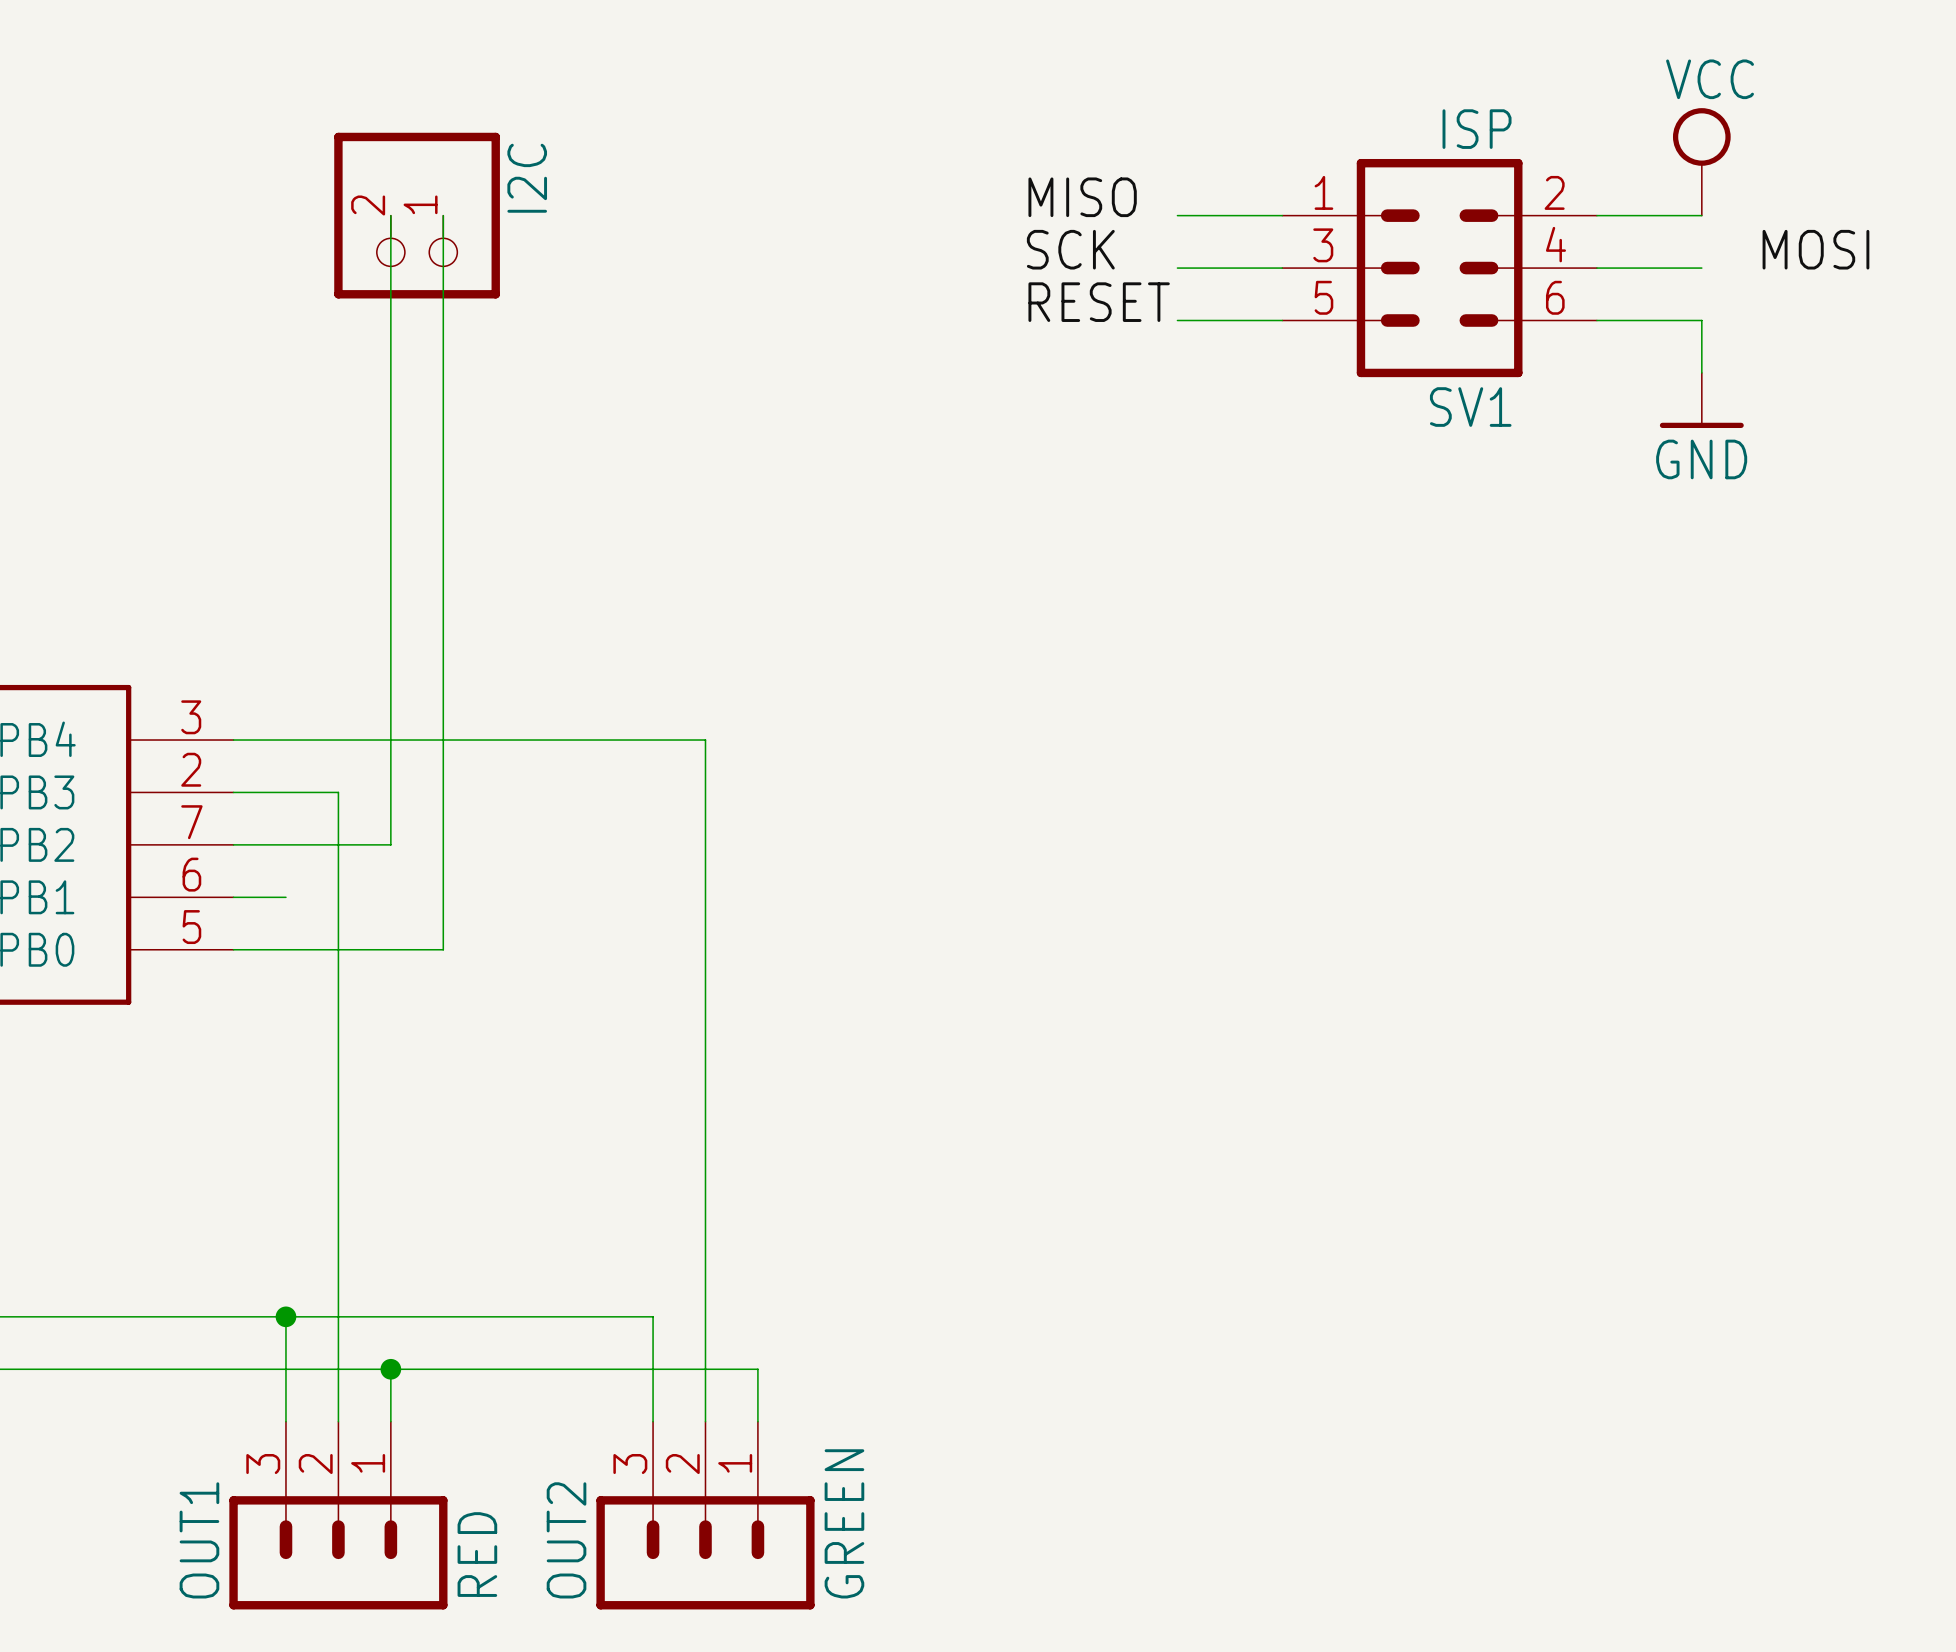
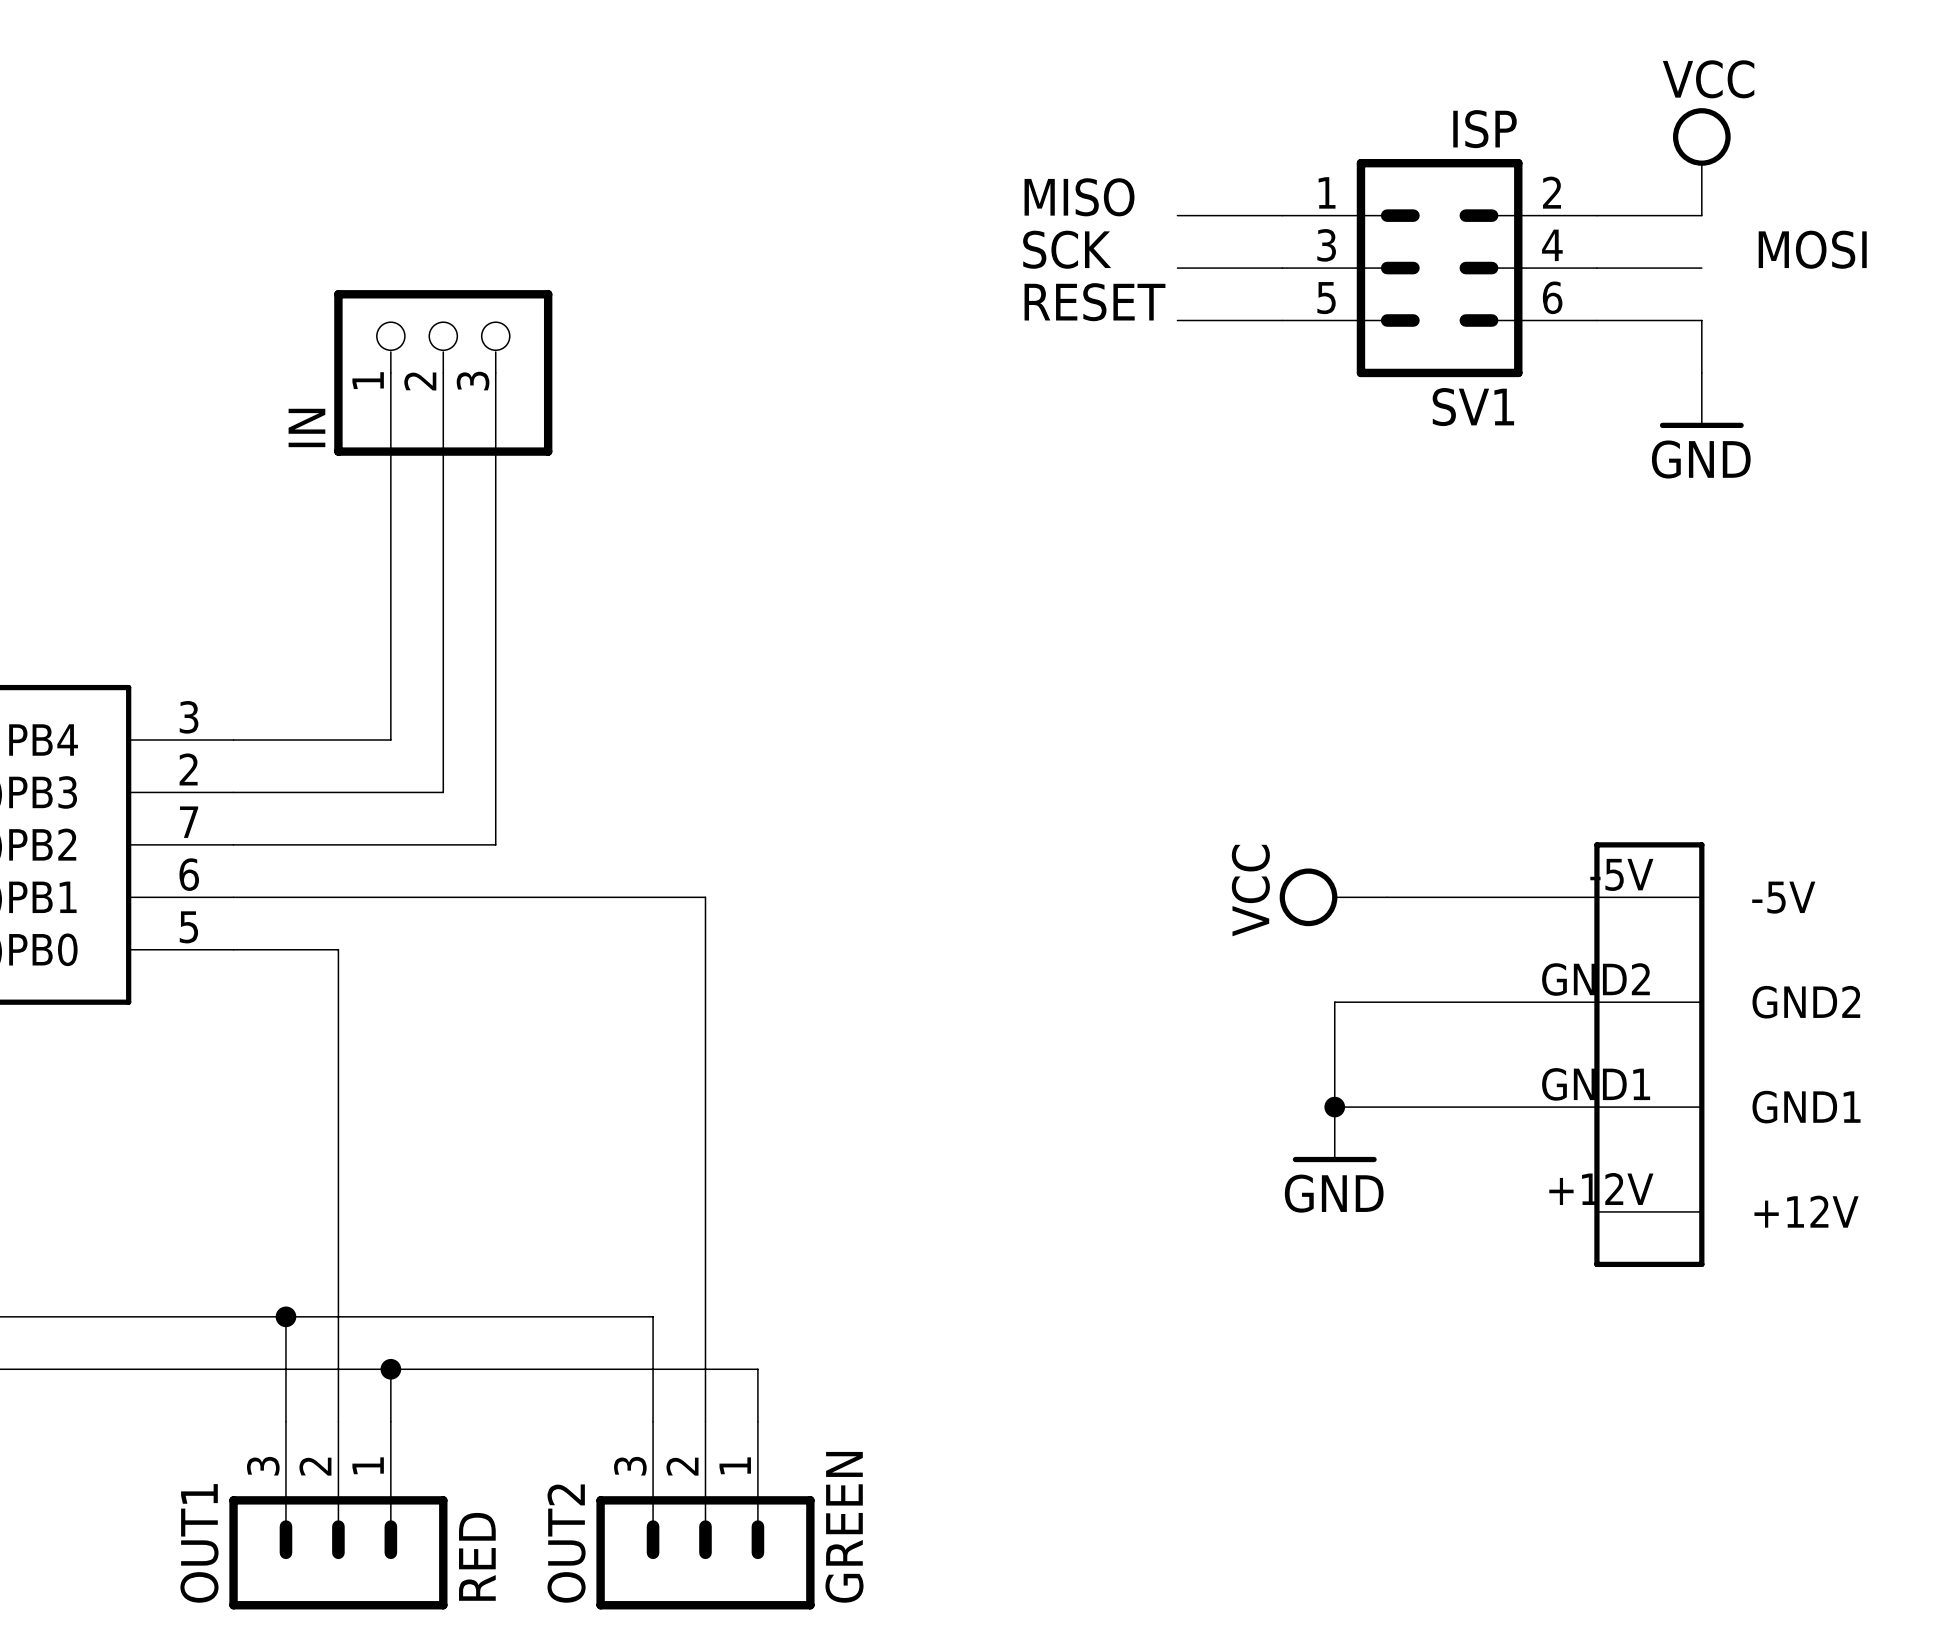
wire: (390, 215) (390, 372) -> none
I2C: (417, 215) -> none
wire: (443, 215) (443, 372) -> none
IN: none -> (443, 372)
wire: none -> (495, 372) (495, 844) (390, 844)
wire: (338, 792) (338, 949) (443, 949) (443, 792) -> (338, 792) (443, 792)
wire: (390, 844) (390, 740) (705, 740) (705, 897) -> (285, 897) (705, 897)
power symbol: none -> VCC (1333, 897)
wire: none -> (1387, 897) (1596, 897)
wire: none -> (1596, 1002) (1334, 1002) (1334, 1107) (1596, 1107)
part: none -> (1649, 1054)
junction: none -> (1334, 1107)
power symbol: none -> GND (1334, 1134)

